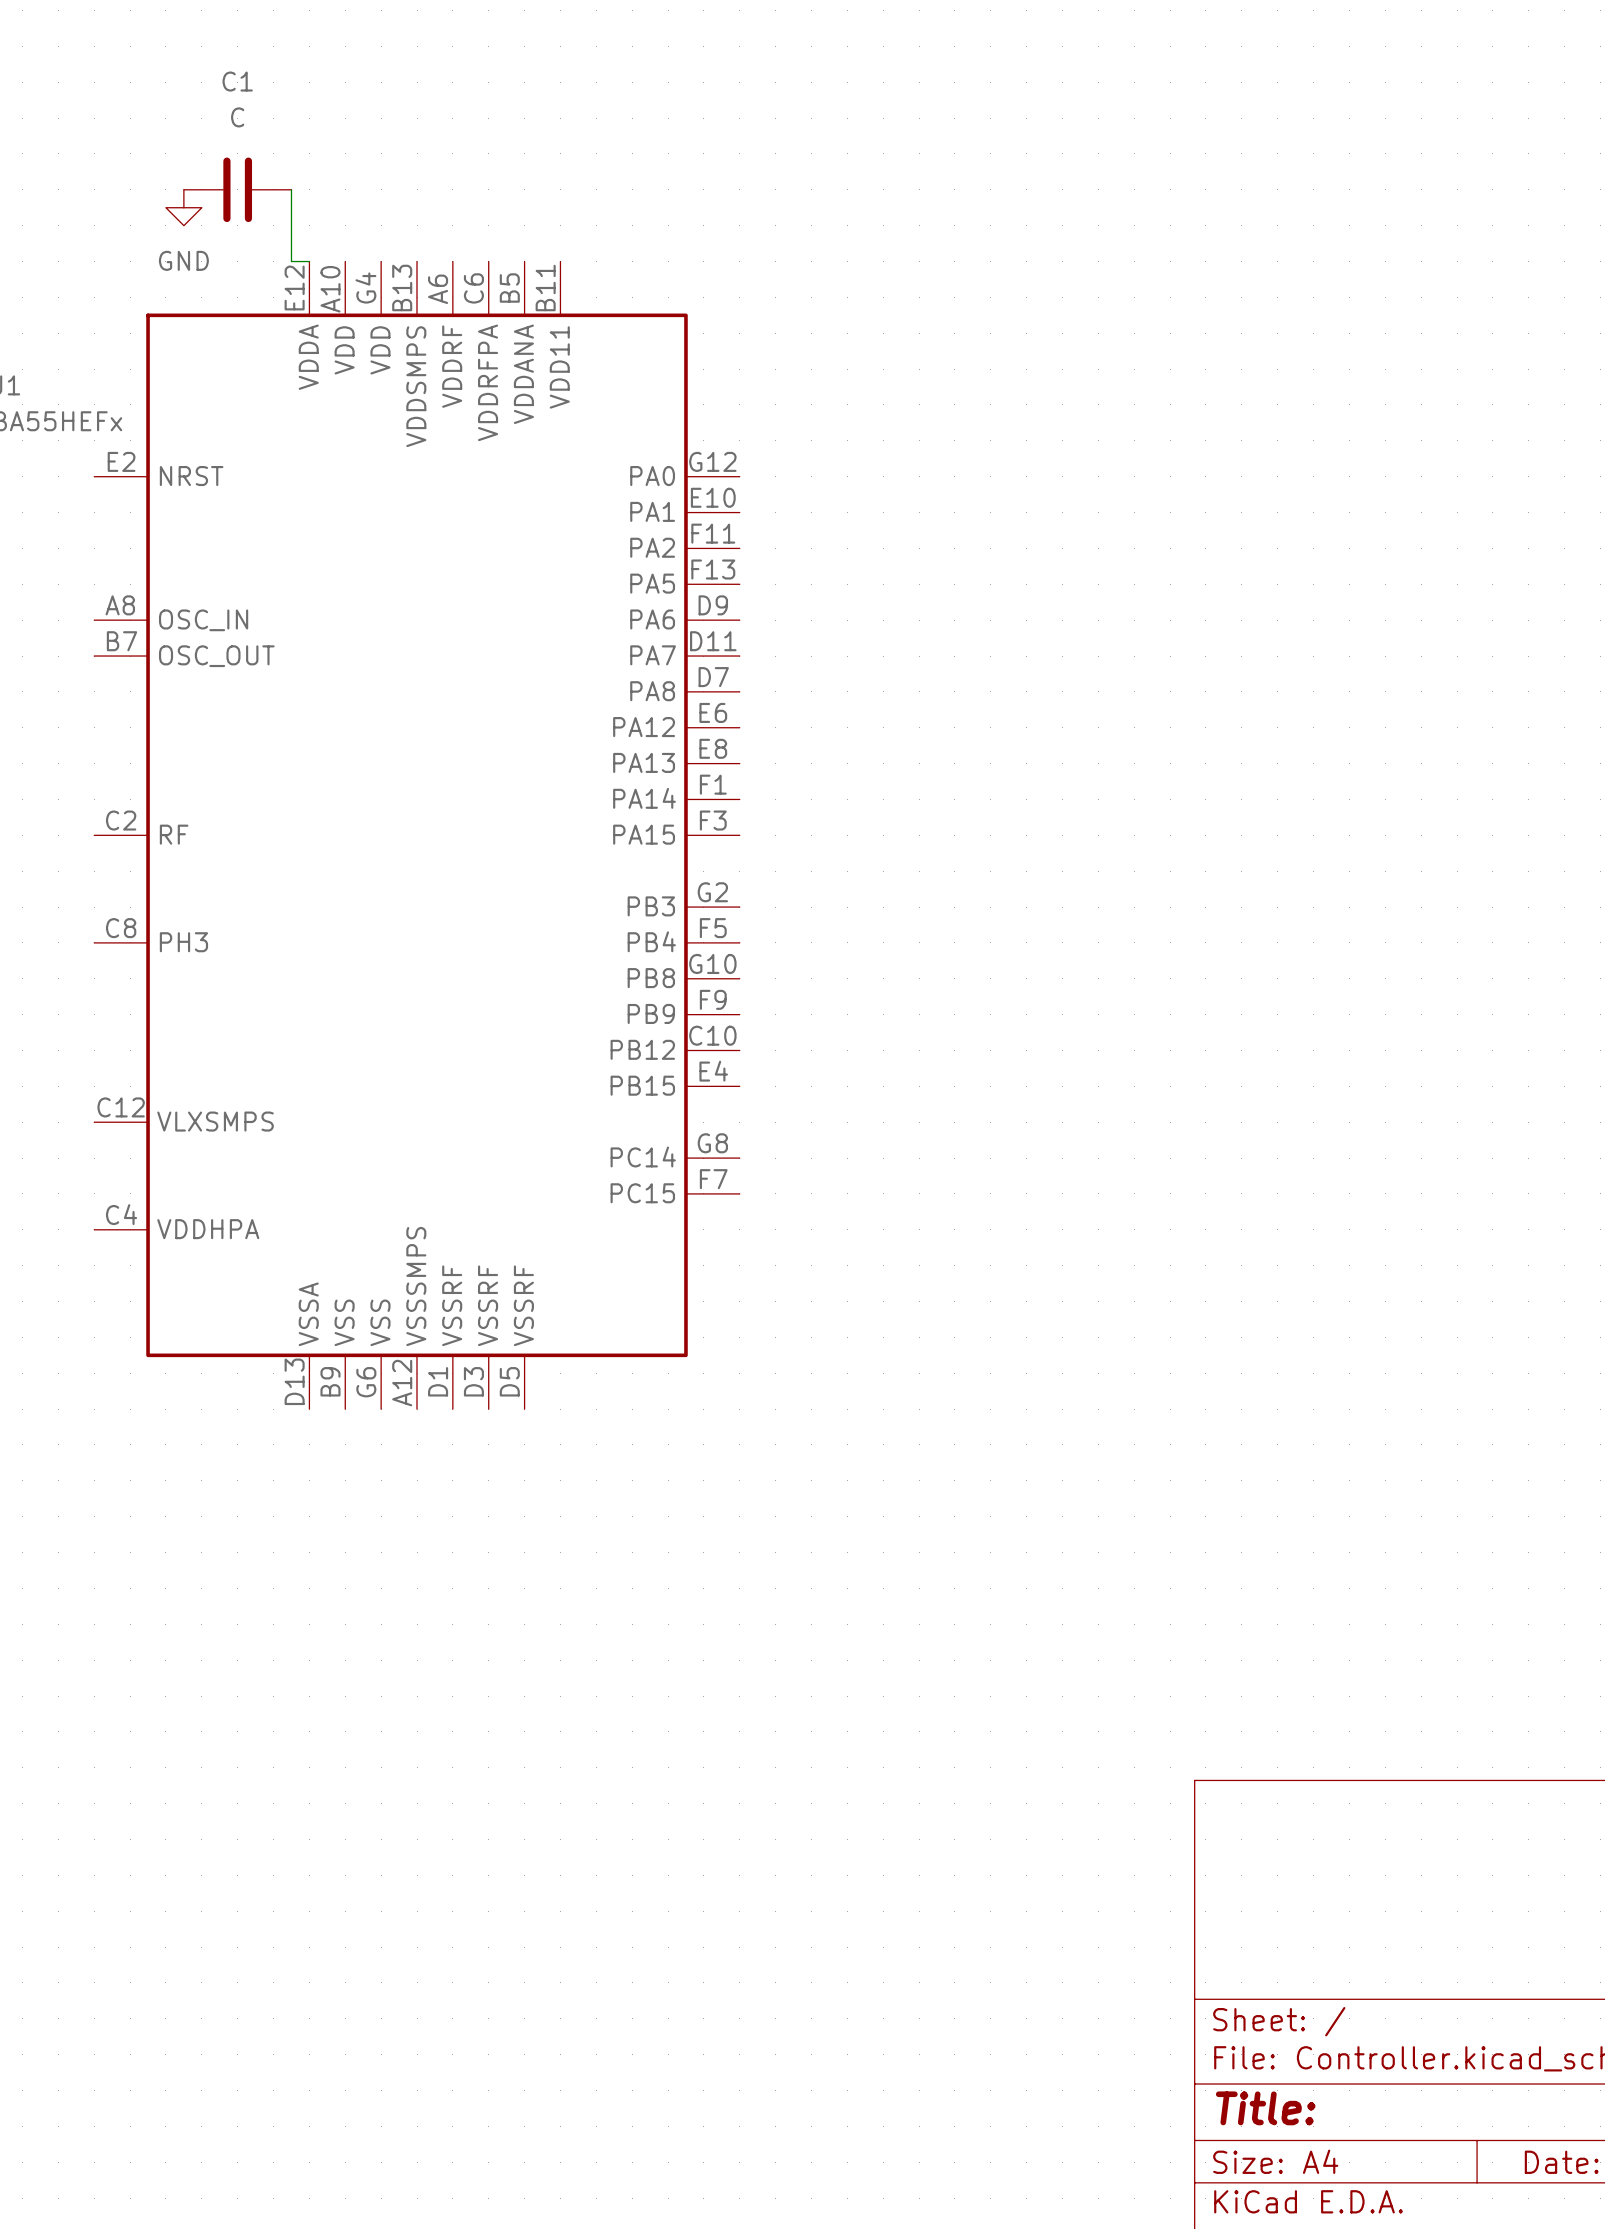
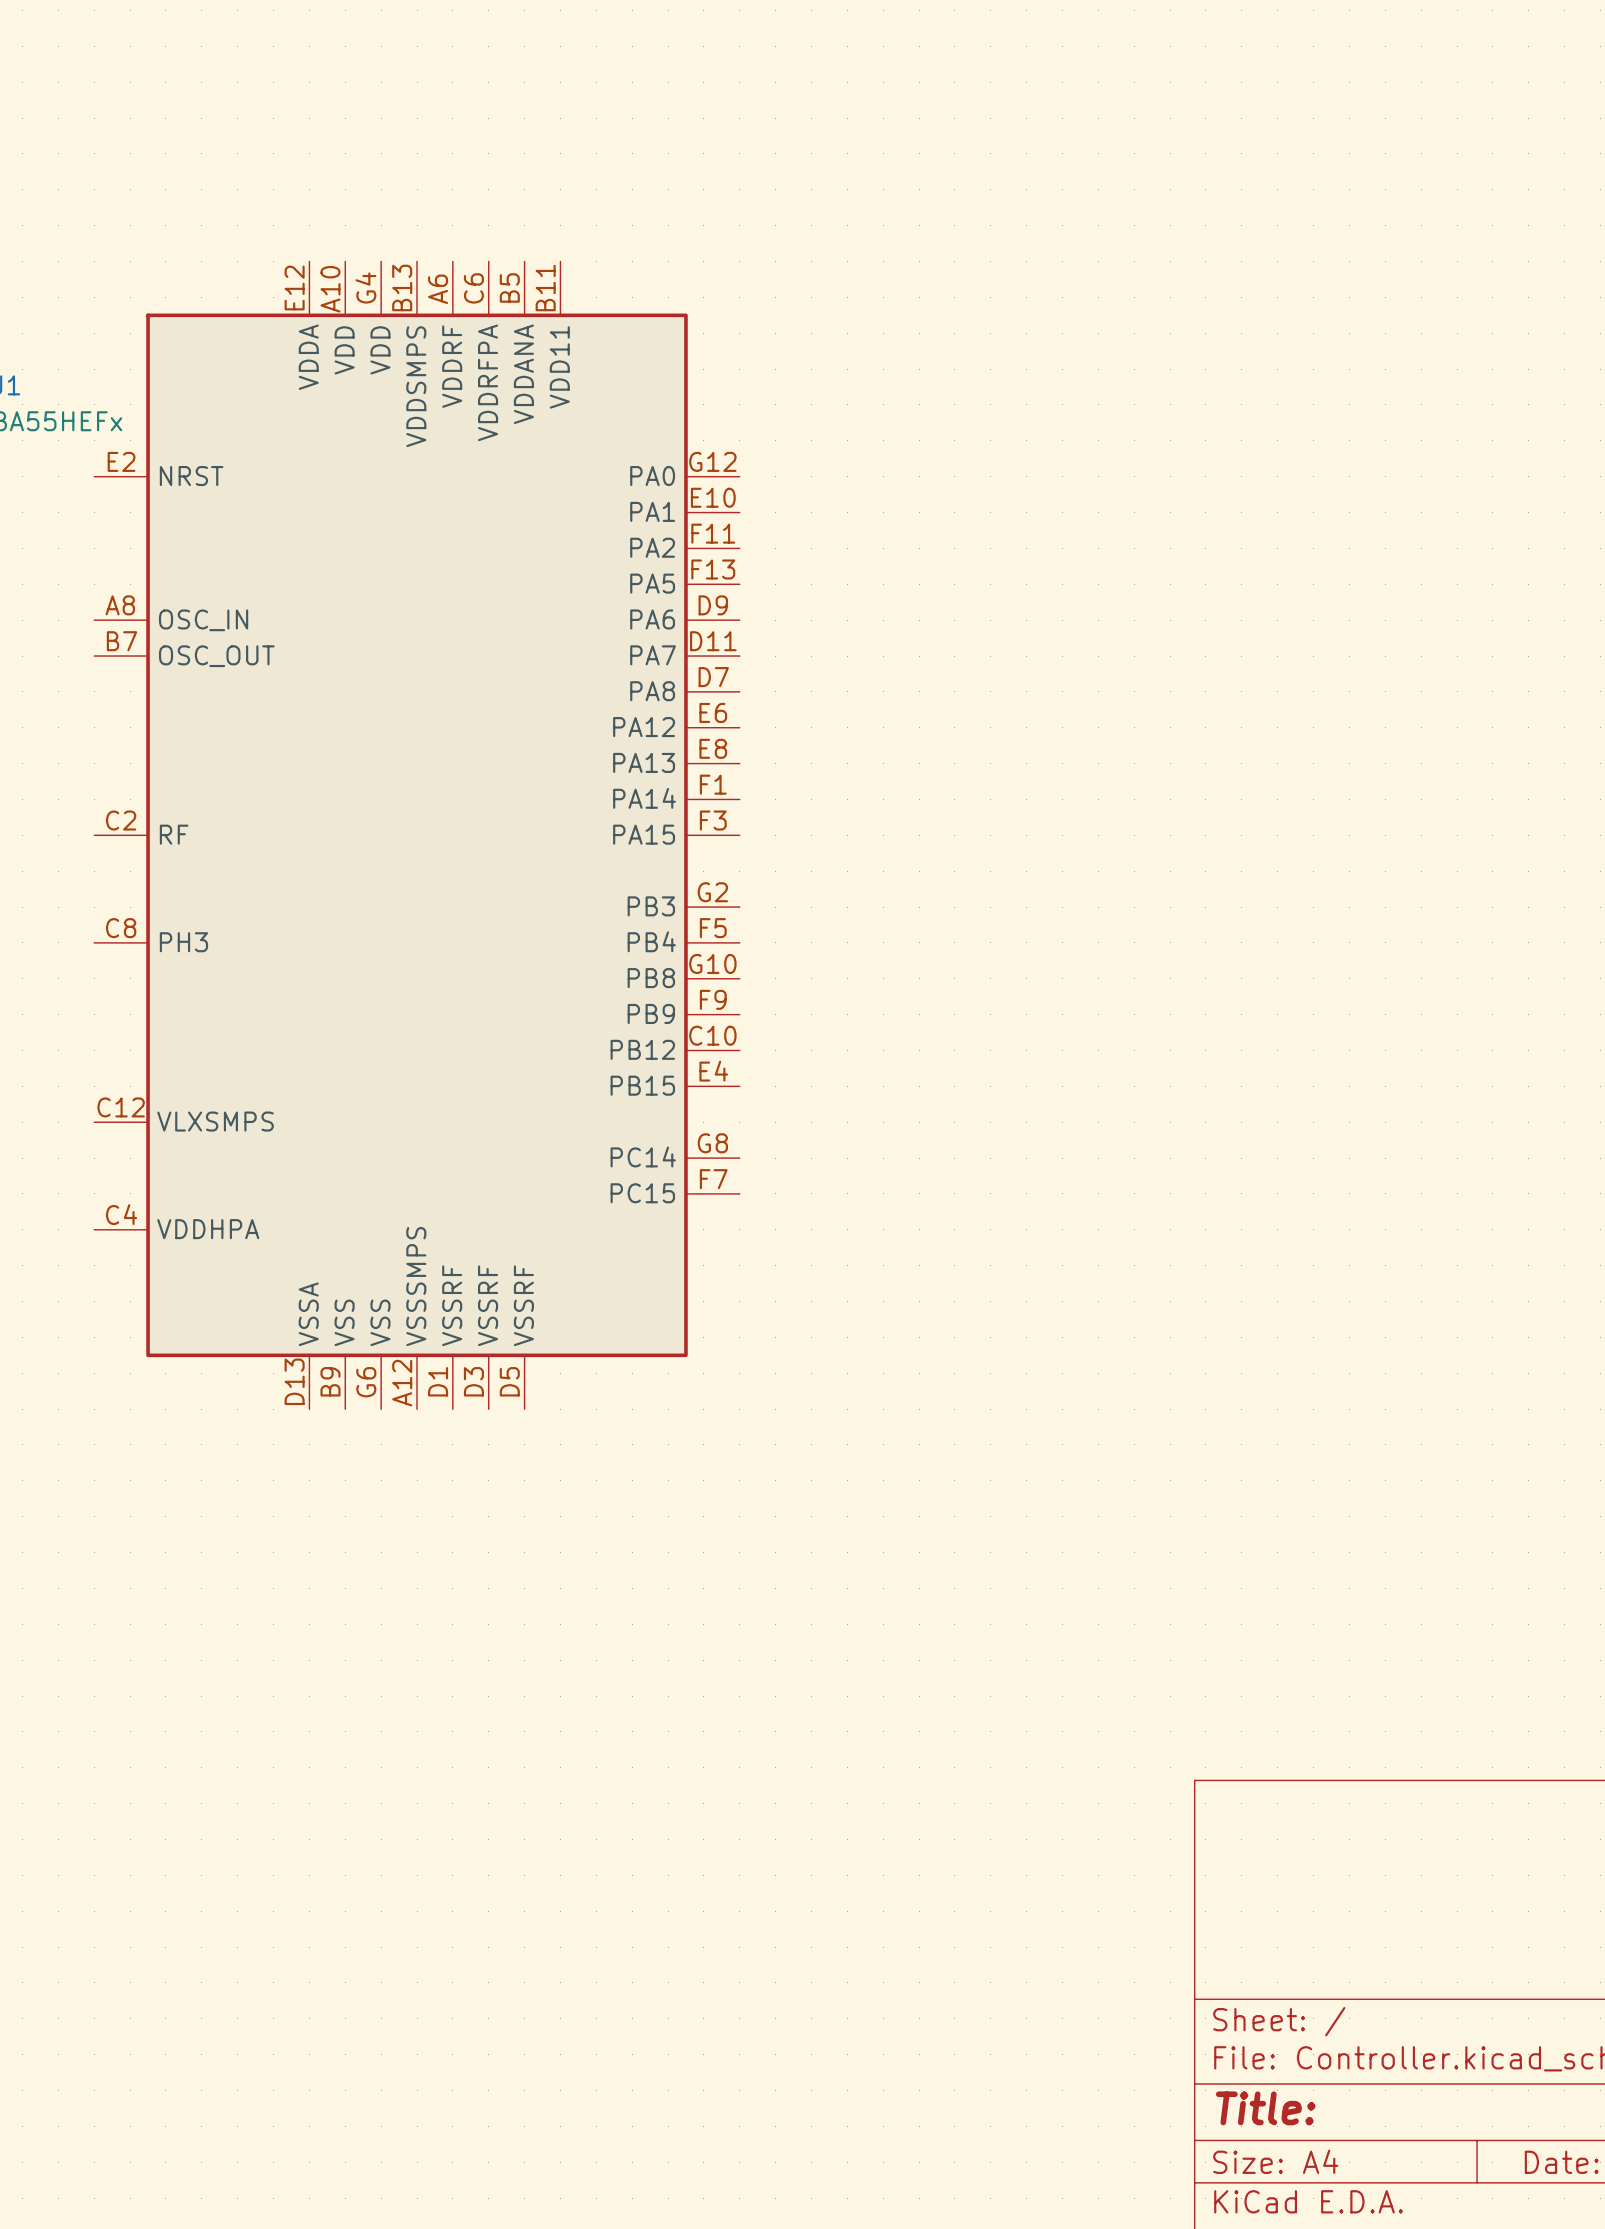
C1: C (237, 189) -> none
wire: (291, 189) (291, 261) (309, 261) -> none
power symbol: GND (183, 207) -> none

